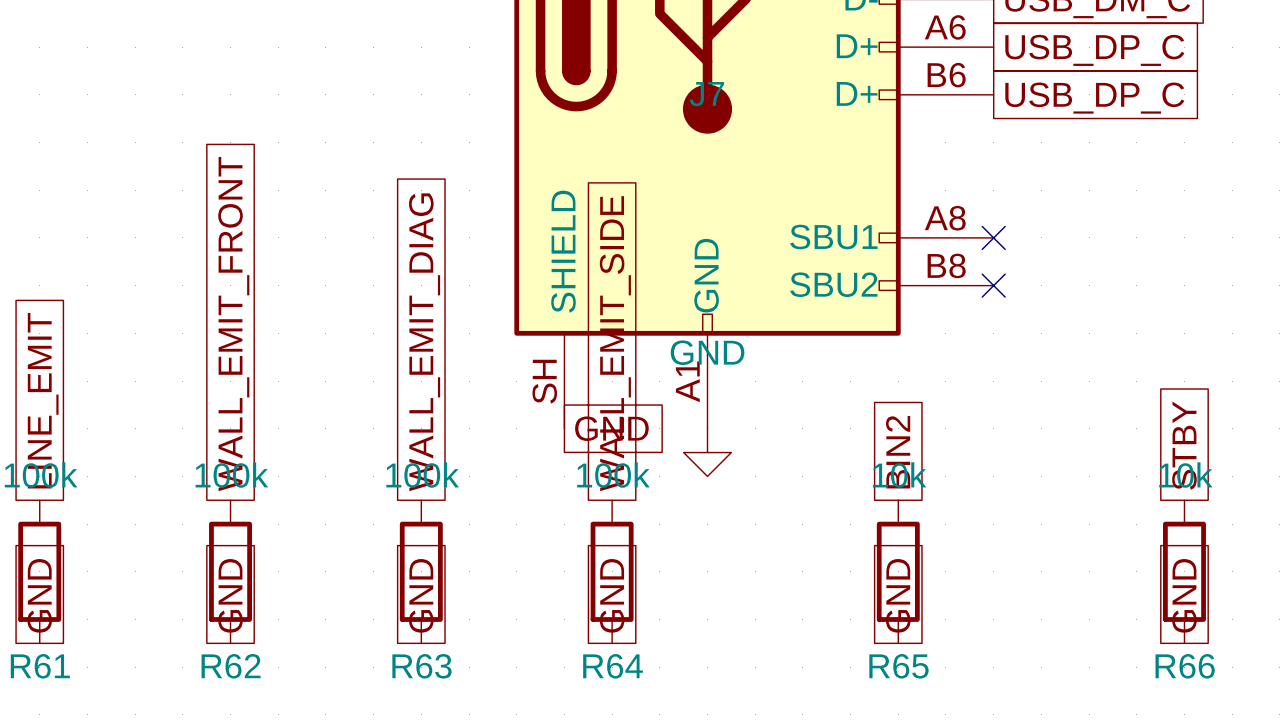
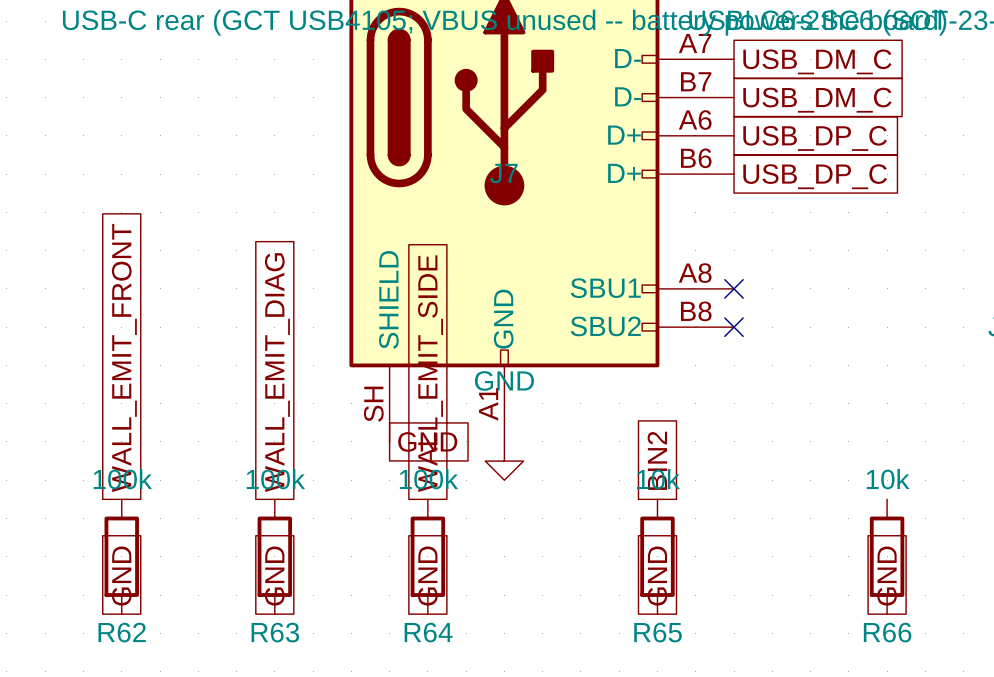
global label: STBY (1184, 445) -> none

